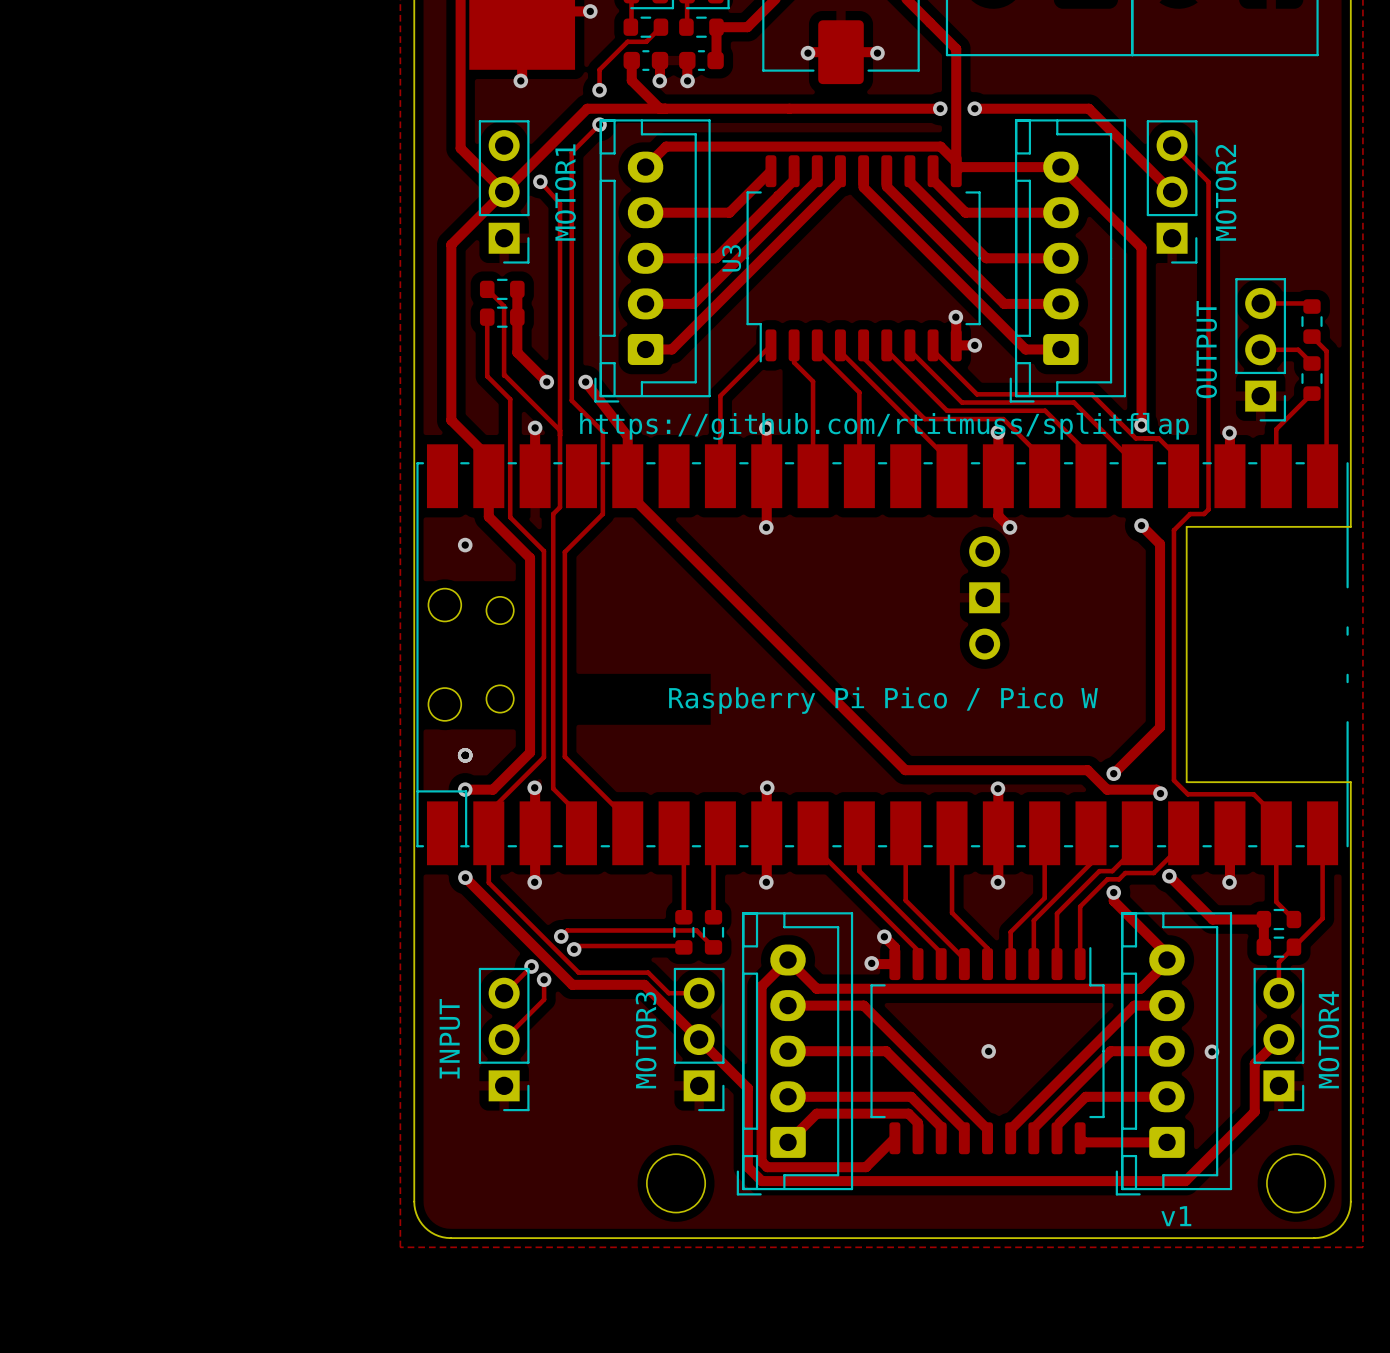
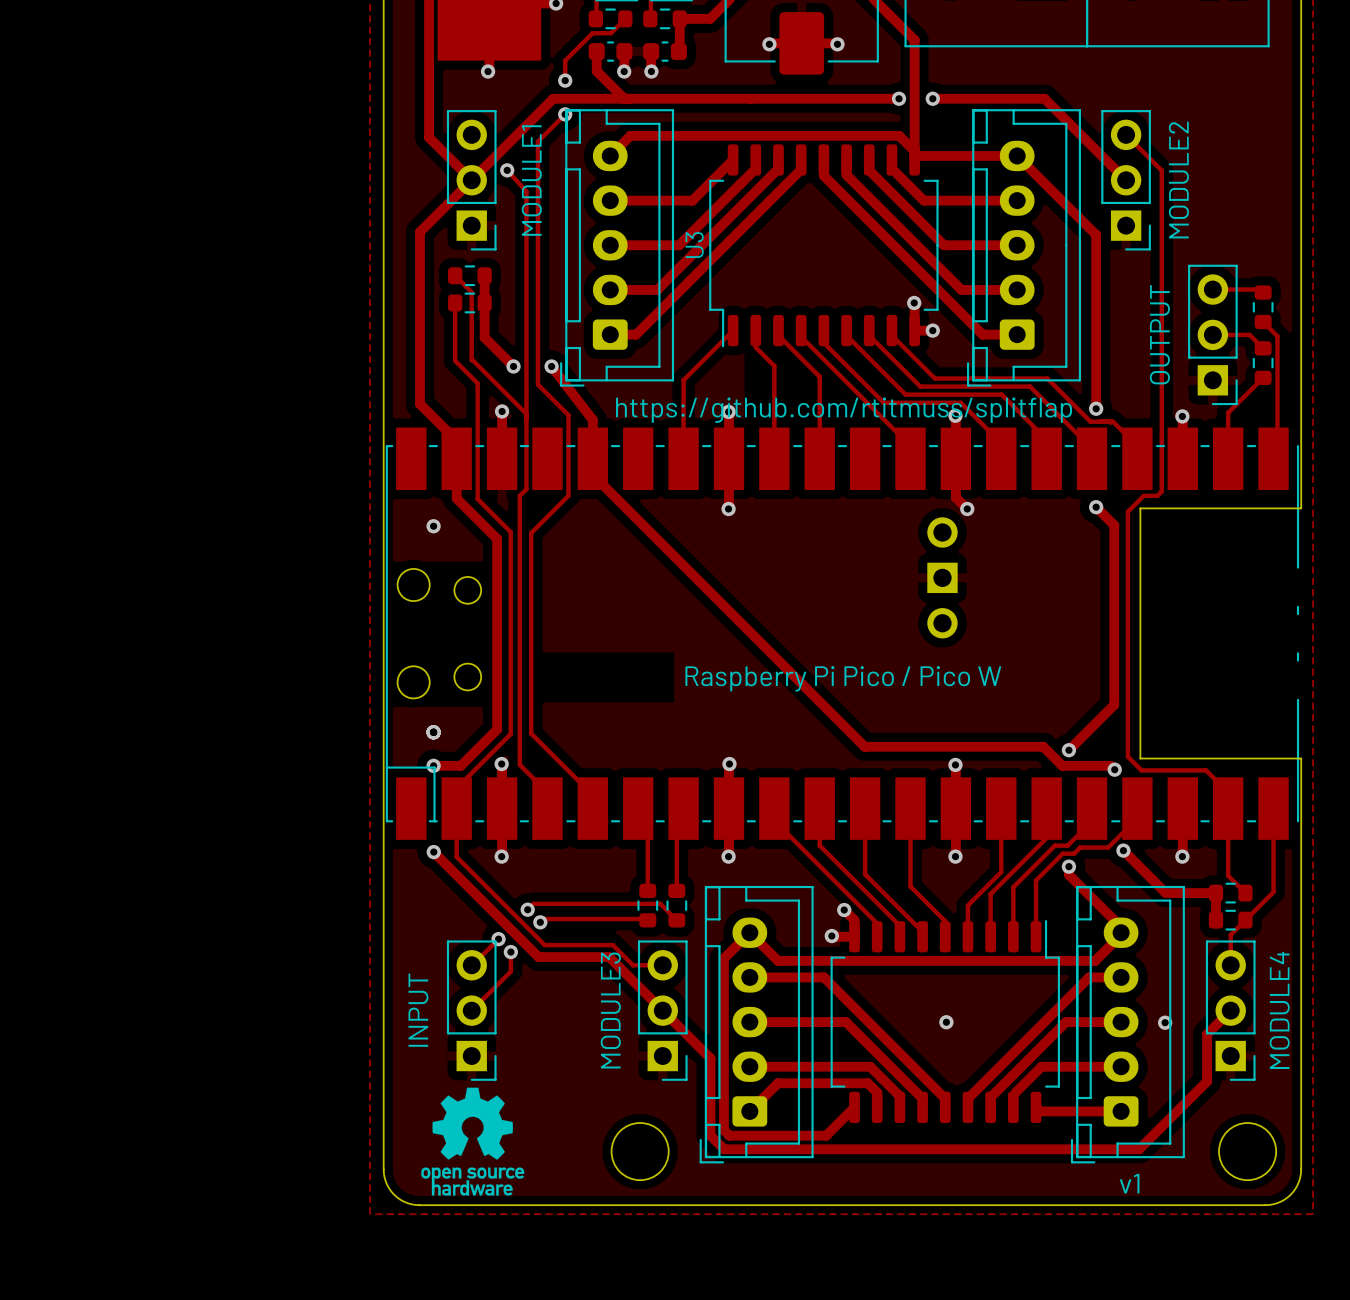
text: MOTOR1 (565, 192) -> MODULE1 (531, 180)
text: MOTOR2 (1226, 192) -> MODULE2 (1178, 180)
text: MOTOR4 (1328, 1039) -> MODULE4 (1279, 1010)
text: MOTOR3 (646, 1040) -> MODULE3 (610, 1010)
drawing: none -> [421, 1087, 525, 1196]

